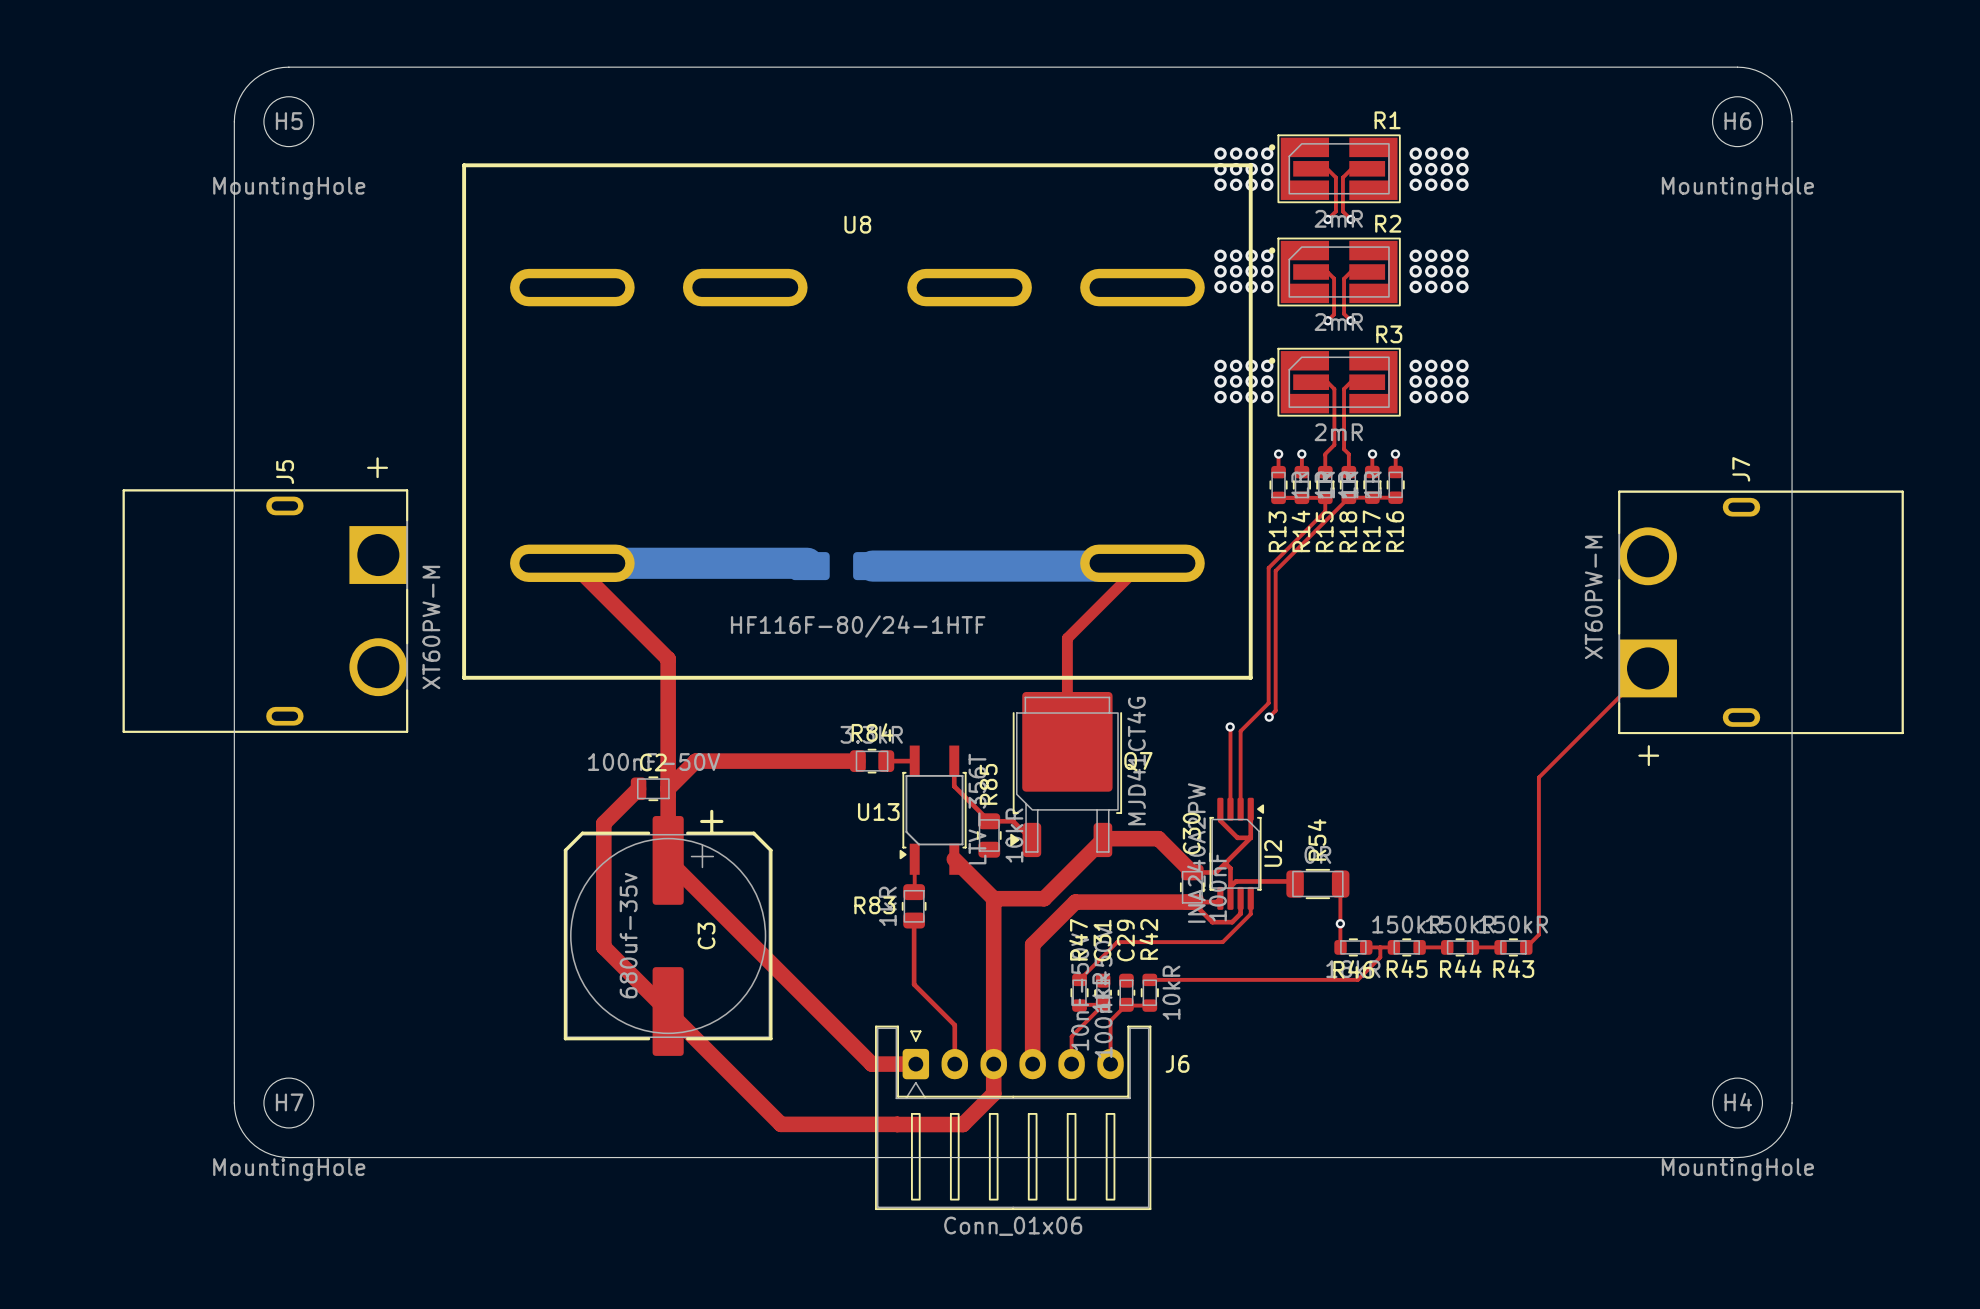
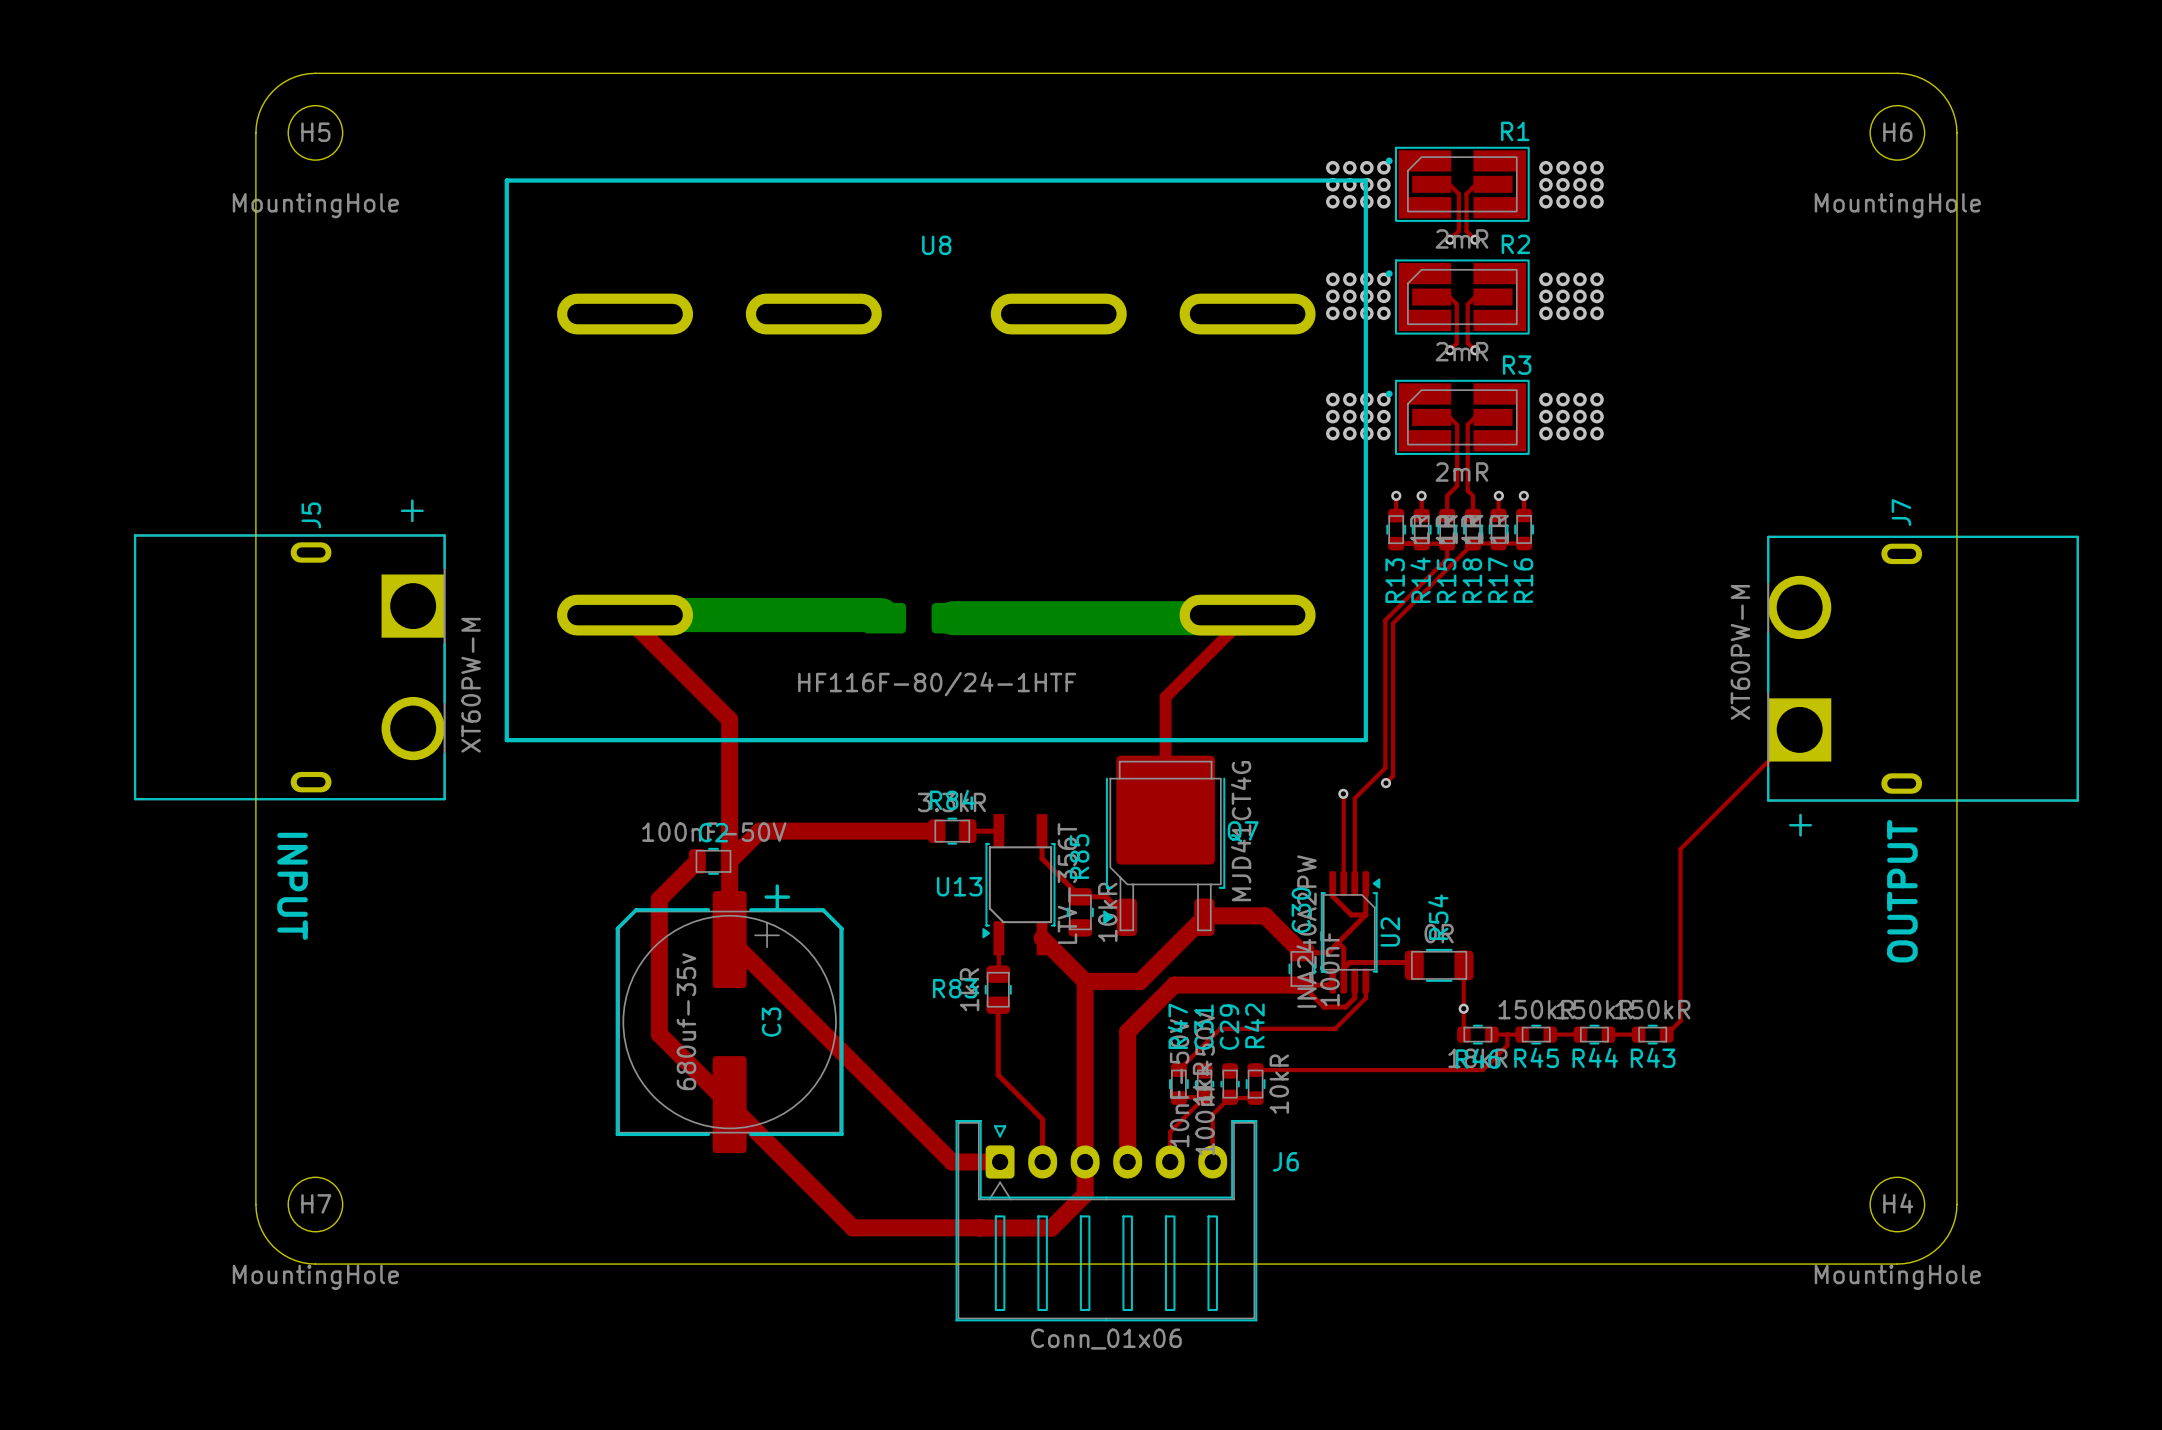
text: none -> INPUT (292, 886)
text: none -> OUTPUT (1902, 891)

